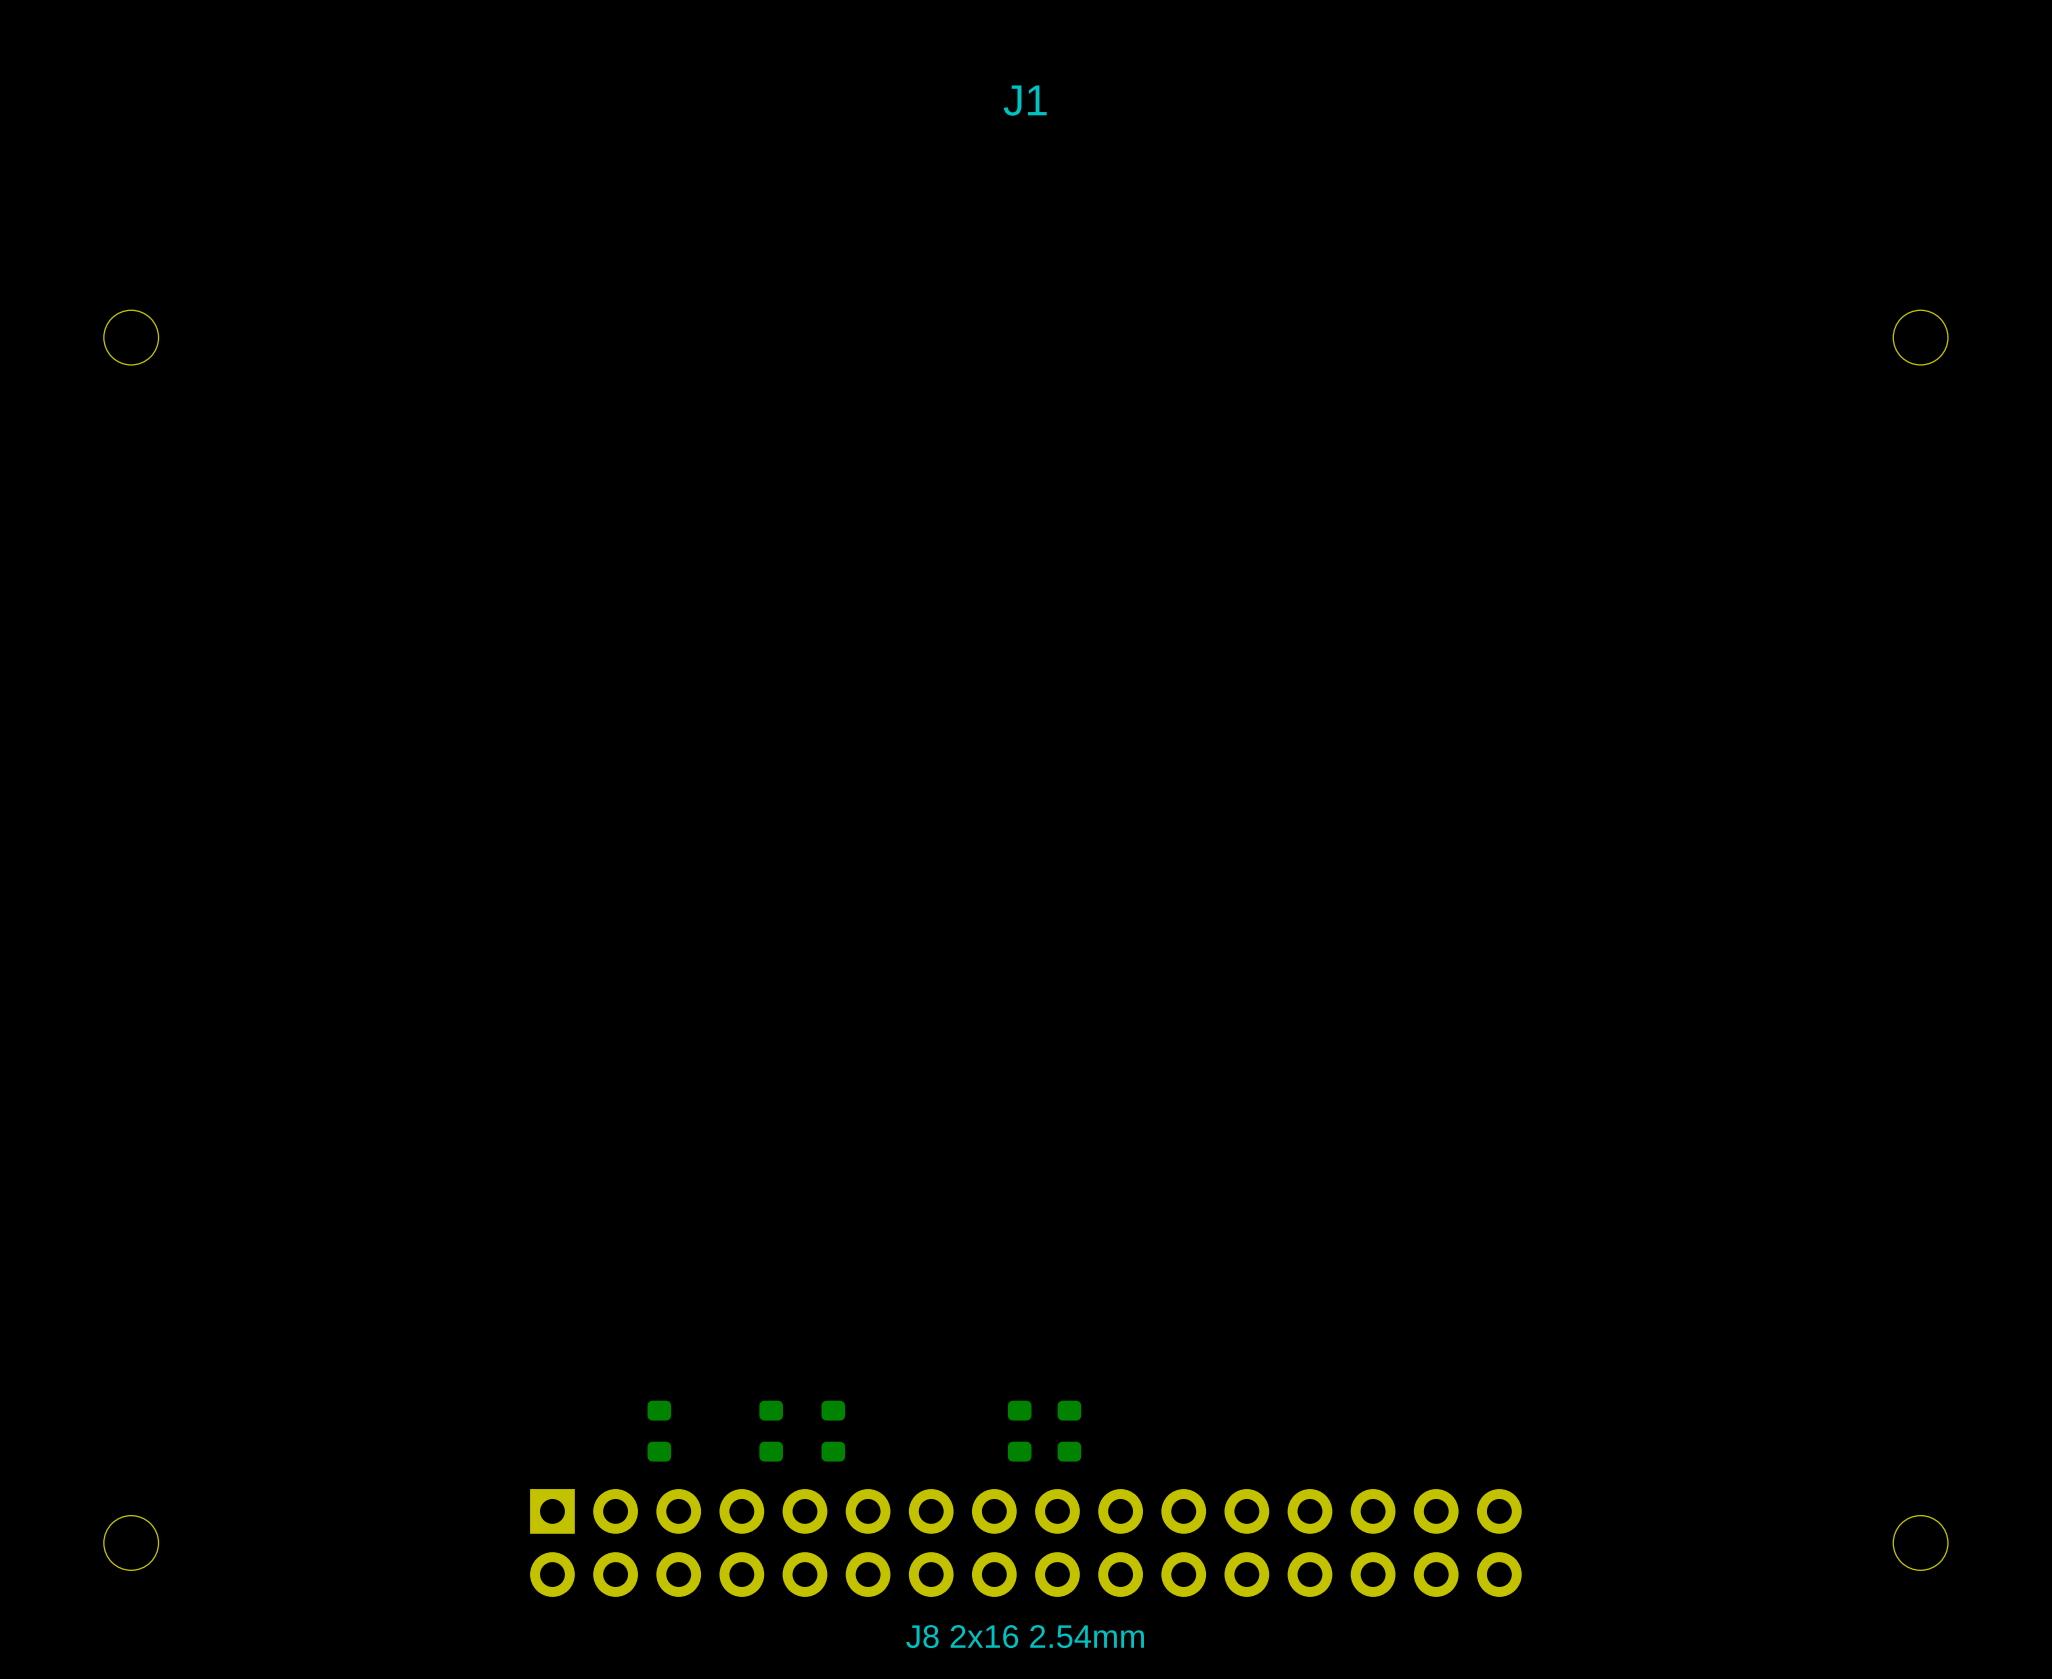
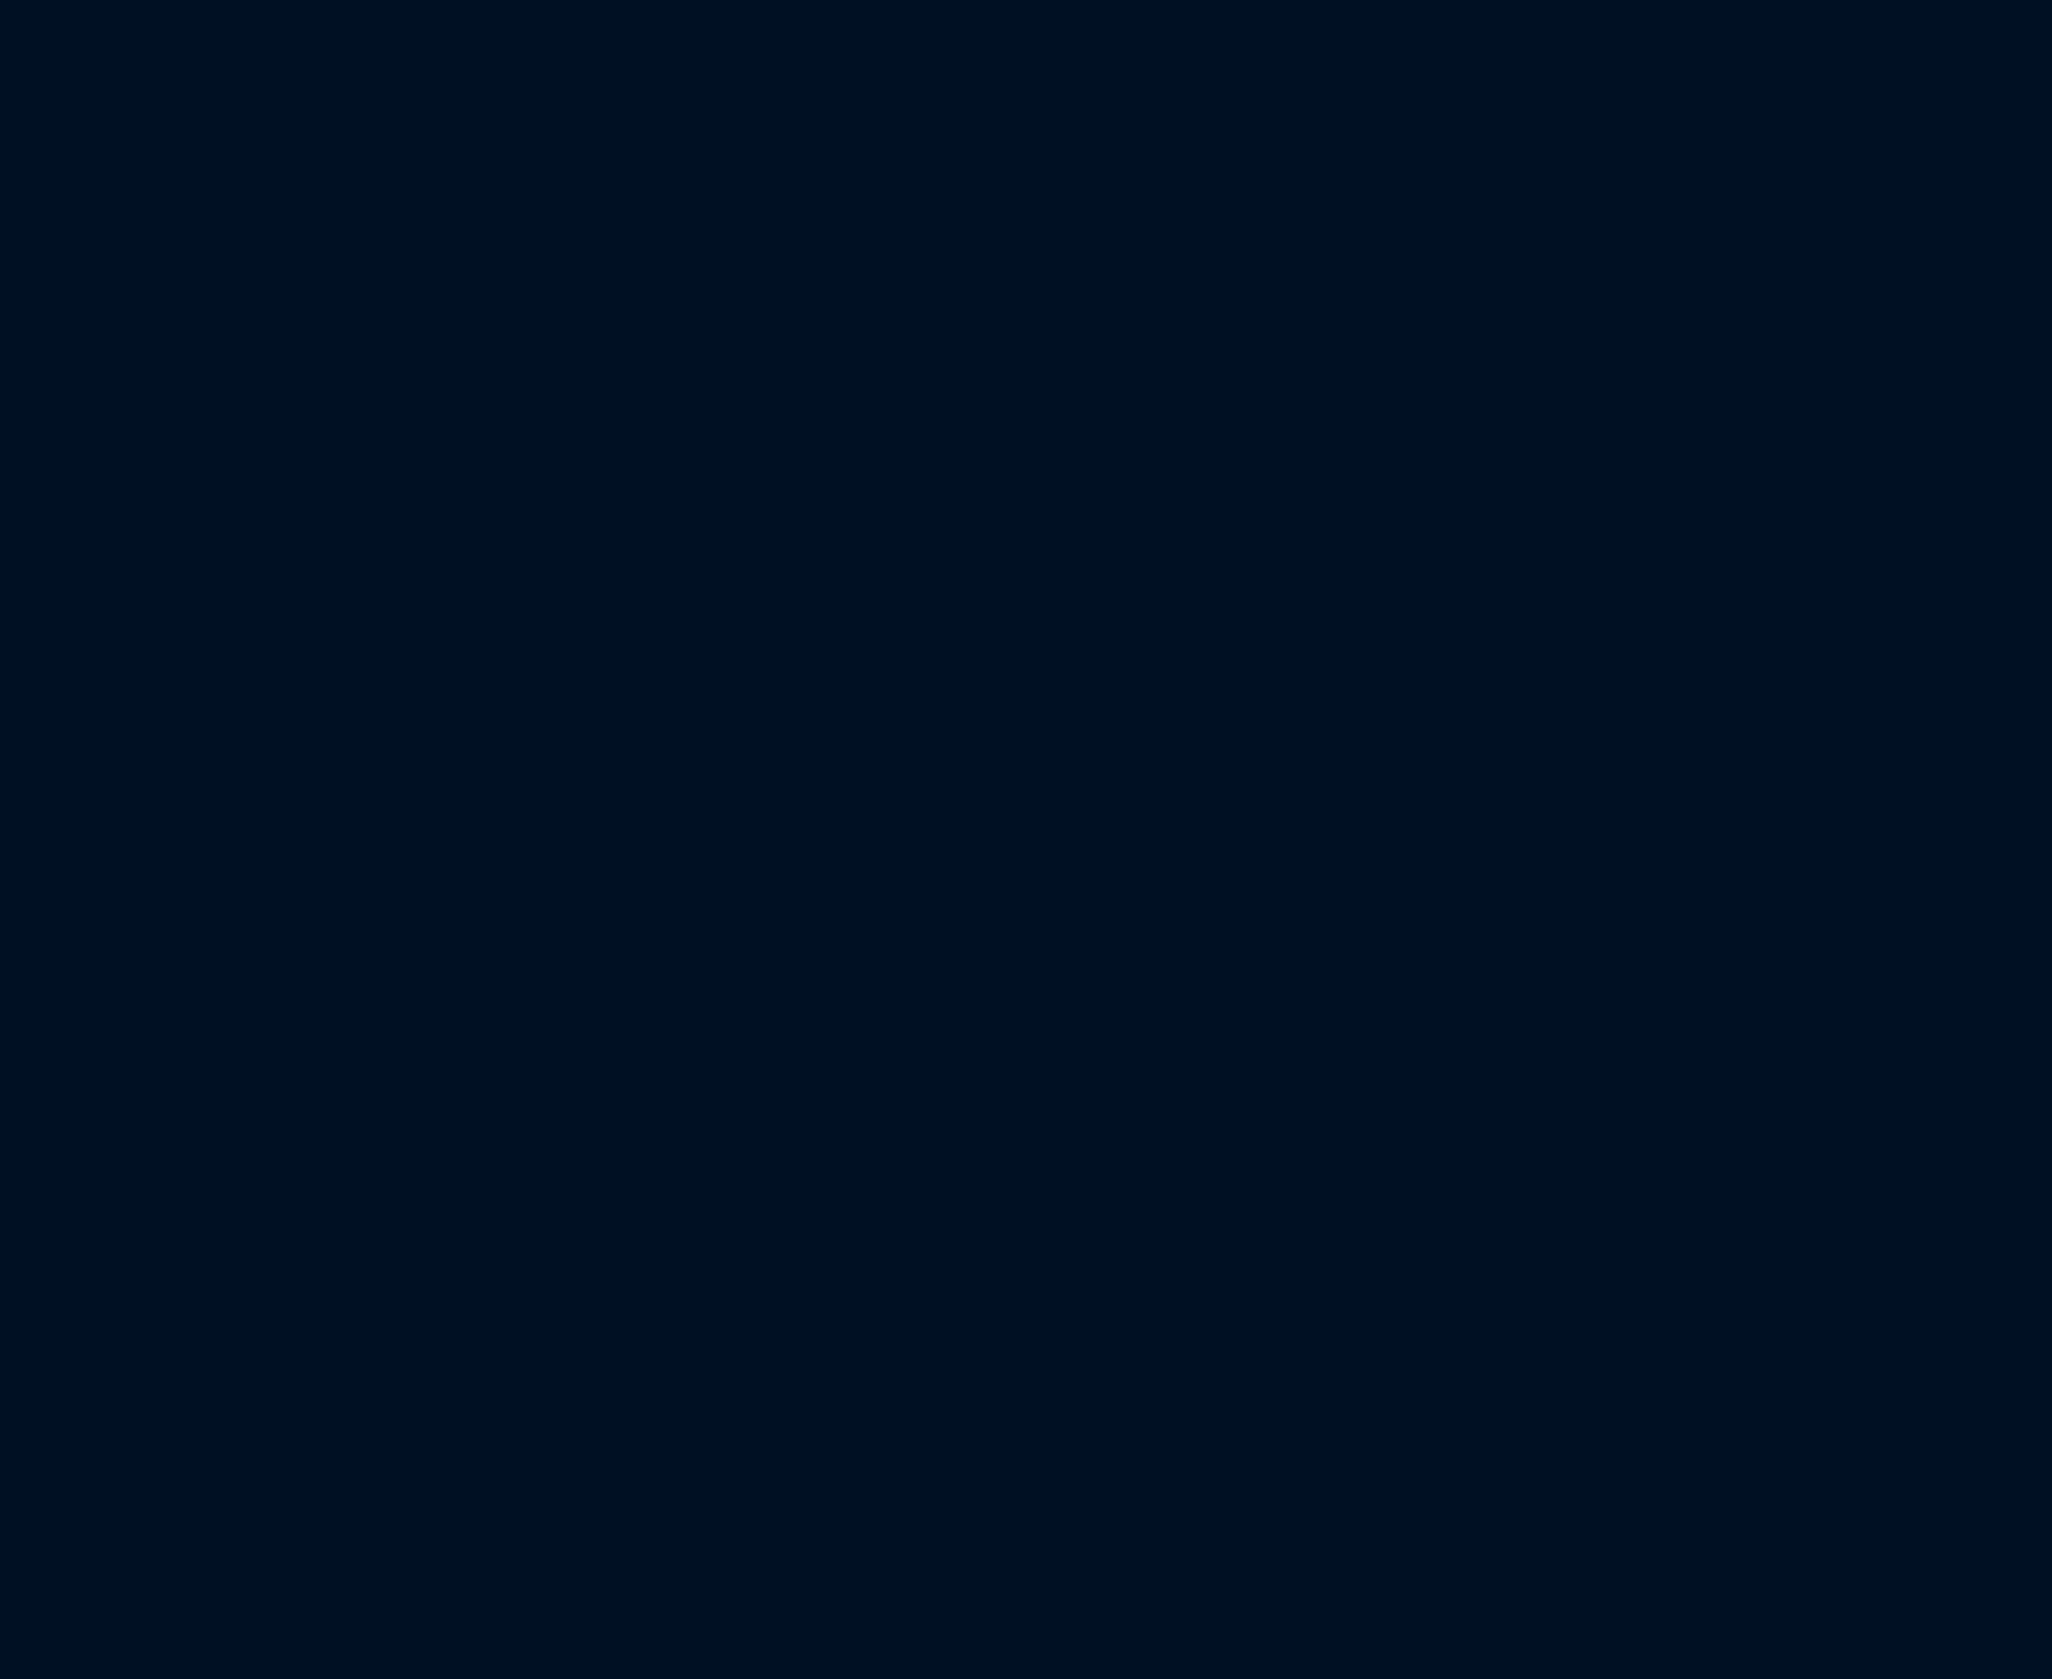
J1: (1025, 953) -> none
part: (659, 1431) -> none
part: (771, 1431) -> none
part: (833, 1431) -> none
part: (1019, 1431) -> none
part: (1069, 1431) -> none

